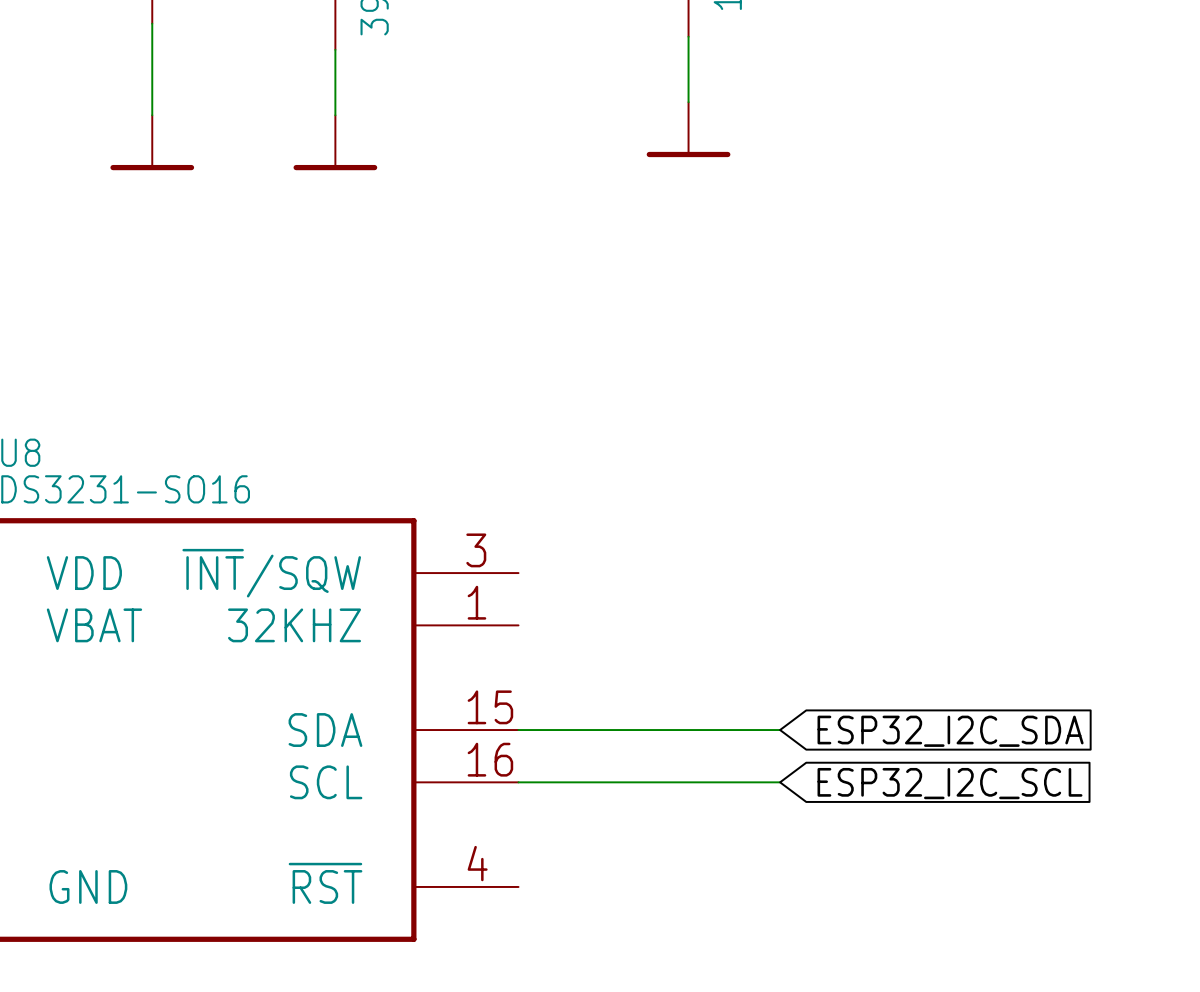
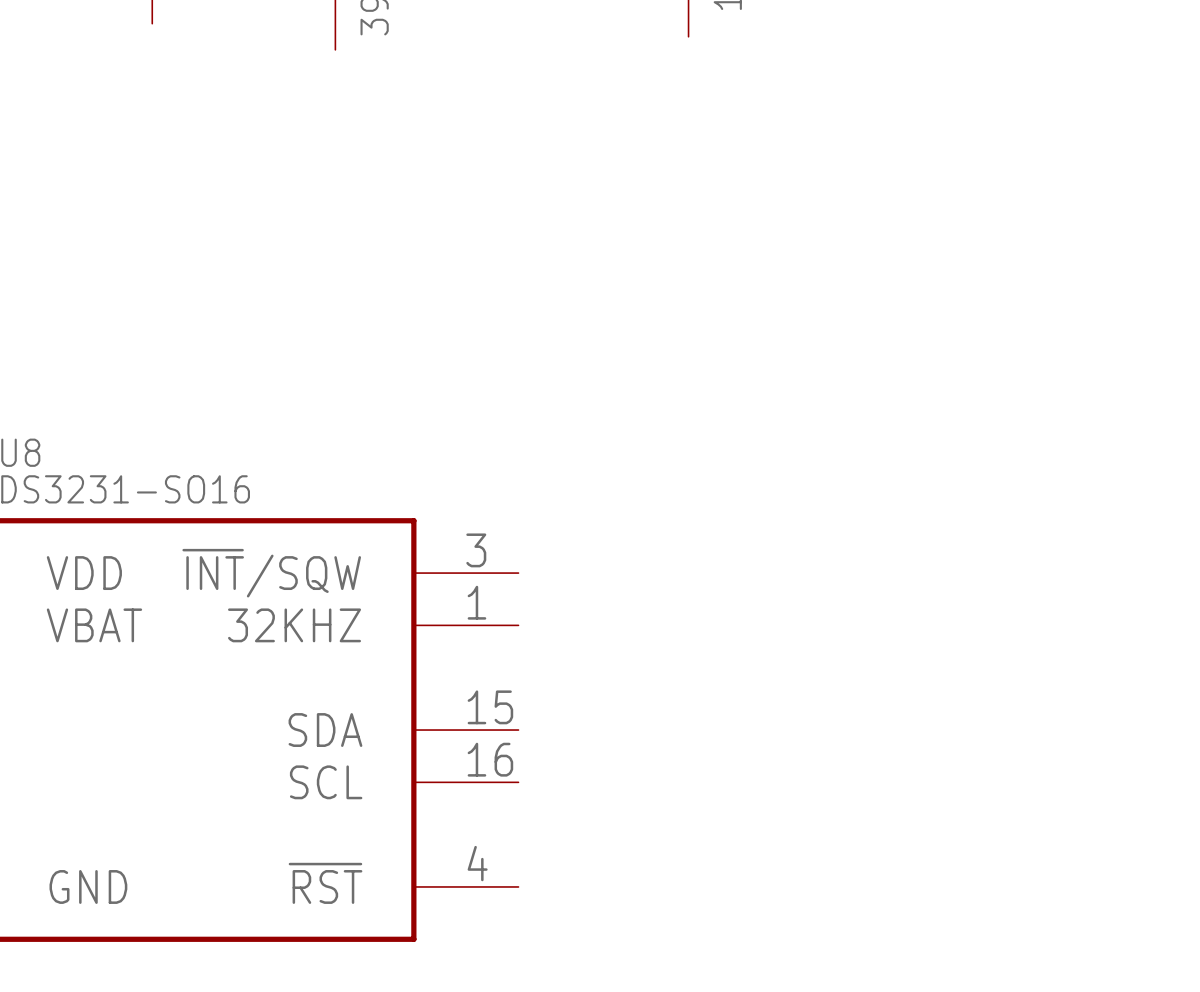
wire: (152, 23) (152, 115) -> none
wire: (688, 36) (688, 102) -> none
wire: (335, 49) (335, 115) -> none
power symbol: (688, 129) -> none
power symbol: (152, 142) -> none
power symbol: (335, 142) -> none
wire: (518, 730) (780, 730) -> none
global label: ESP32_I2C_SDA (950, 731) -> none
wire: (518, 782) (780, 782) -> none
global label: ESP32_I2C_SCL (949, 783) -> none

